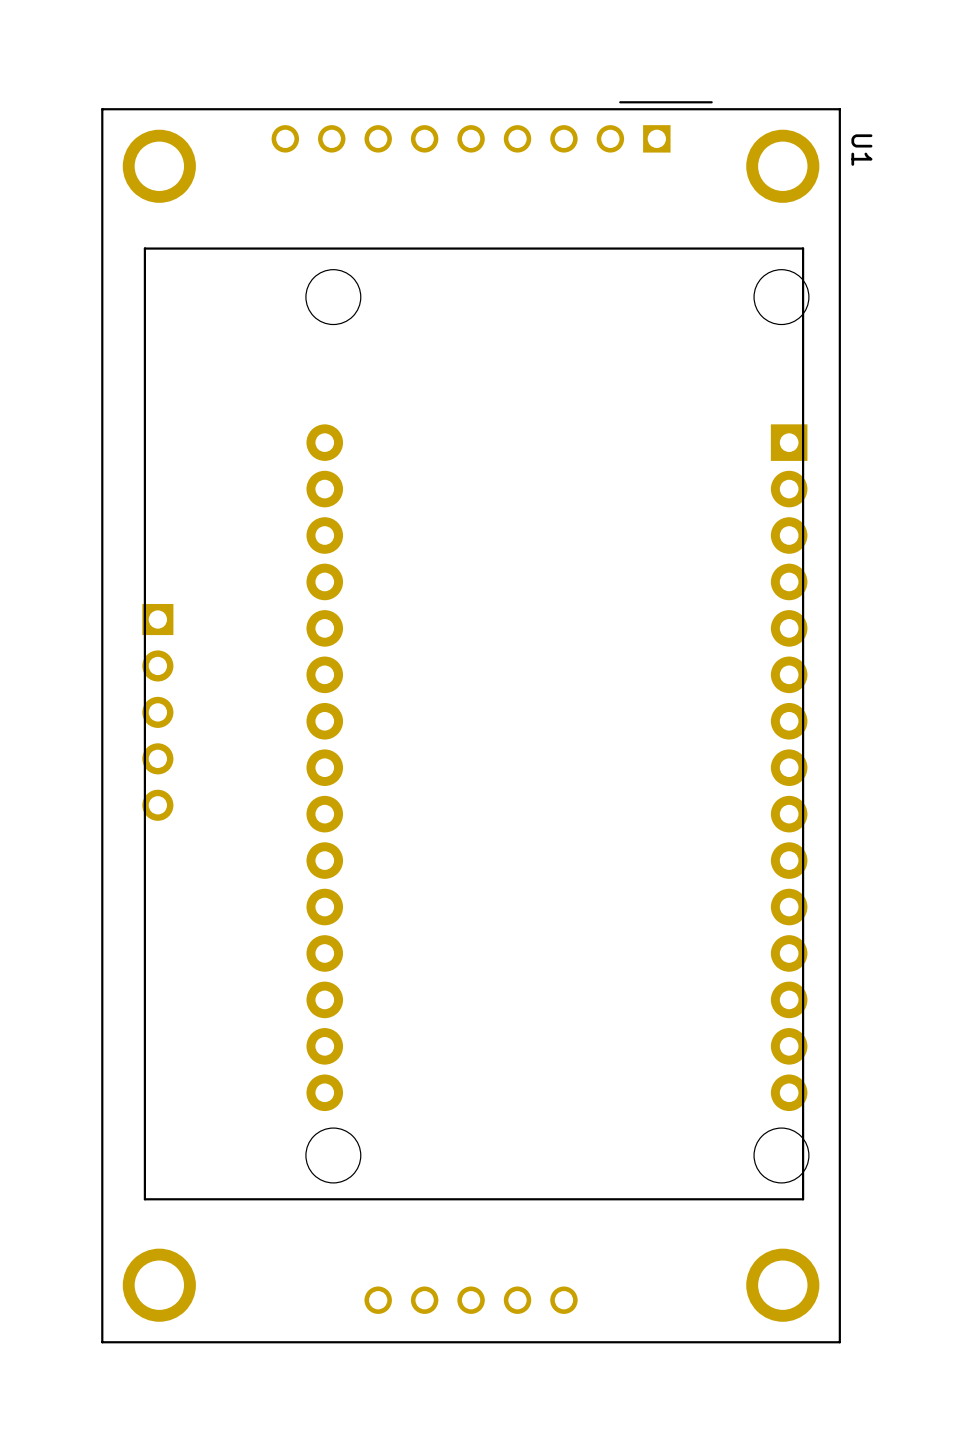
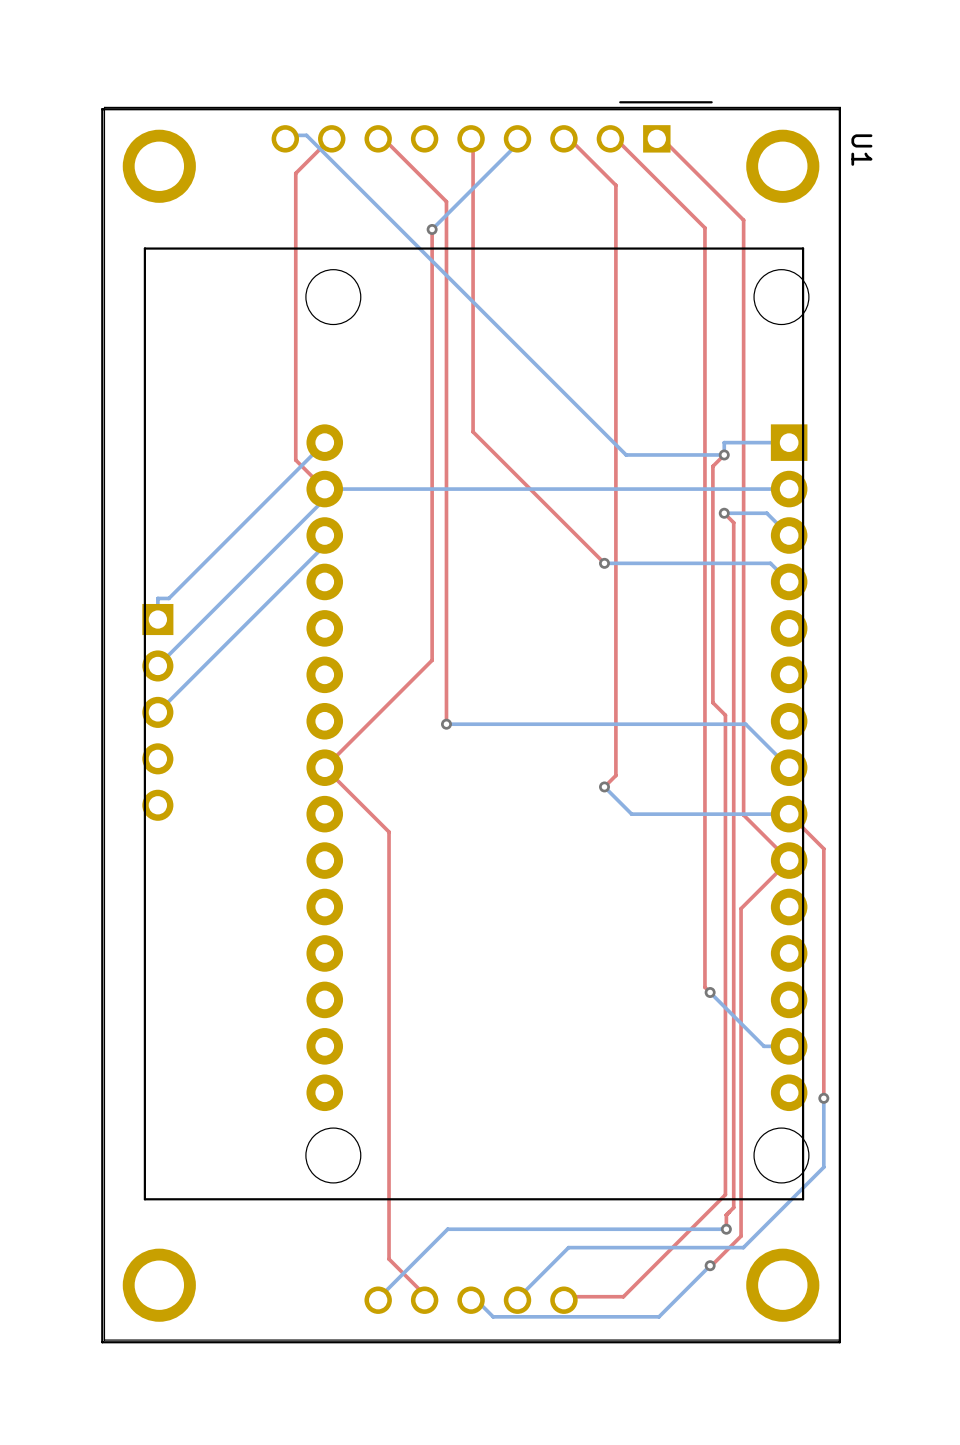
board edge: none -> (840, 107) (104, 107) (104, 1340) (840, 1340) (840, 107)
bottom track: none -> (287, 135) (306, 135) (626, 454) (724, 454) (724, 442) (789, 442)
top track: none -> (333, 135) (295, 173) (295, 460) (324, 489)
top track: none -> (380, 135) (446, 201) (446, 724)
top track: none -> (473, 135) (473, 431) (604, 563)
bottom track: none -> (519, 135) (519, 142) (432, 229)
top track: none -> (565, 135) (615, 185) (615, 775) (604, 786)
top track: none -> (612, 135) (704, 227) (704, 987) (710, 992)
top track: none -> (658, 135) (743, 220) (743, 815) (789, 860) (741, 908) (741, 1236) (710, 1265)
top track: none -> (432, 229) (432, 660) (324, 767) (389, 831) (389, 1259) (426, 1296)
via: none -> (432, 229)
bottom track: none -> (324, 442) (168, 598) (157, 598) (157, 619)
top track: none -> (724, 454) (712, 466) (712, 702) (725, 715) (725, 1194) (623, 1296) (565, 1296)
via: none -> (724, 454)
bottom track: none -> (789, 489) (324, 489) (324, 499) (157, 665)
bottom track: none -> (724, 513) (766, 513) (789, 535)
top track: none -> (724, 513) (733, 522) (733, 1207) (726, 1214) (726, 1229)
via: none -> (724, 513)
bottom track: none -> (324, 535) (324, 545) (157, 712)
bottom track: none -> (604, 563) (770, 563) (789, 581)
via: none -> (604, 563)
bottom track: none -> (446, 724) (745, 724) (789, 767)
via: none -> (446, 724)
bottom track: none -> (604, 786) (631, 814) (789, 814)
via: none -> (604, 786)
top track: none -> (789, 814) (823, 848) (823, 1098)
bottom track: none -> (710, 992) (763, 1046) (789, 1046)
via: none -> (710, 992)
bottom track: none -> (823, 1098) (823, 1167) (743, 1247) (568, 1247) (519, 1296)
via: none -> (823, 1098)
bottom track: none -> (726, 1229) (447, 1229) (380, 1296)
via: none -> (726, 1229)
bottom track: none -> (710, 1265) (659, 1316) (493, 1316) (473, 1296)
via: none -> (710, 1265)

